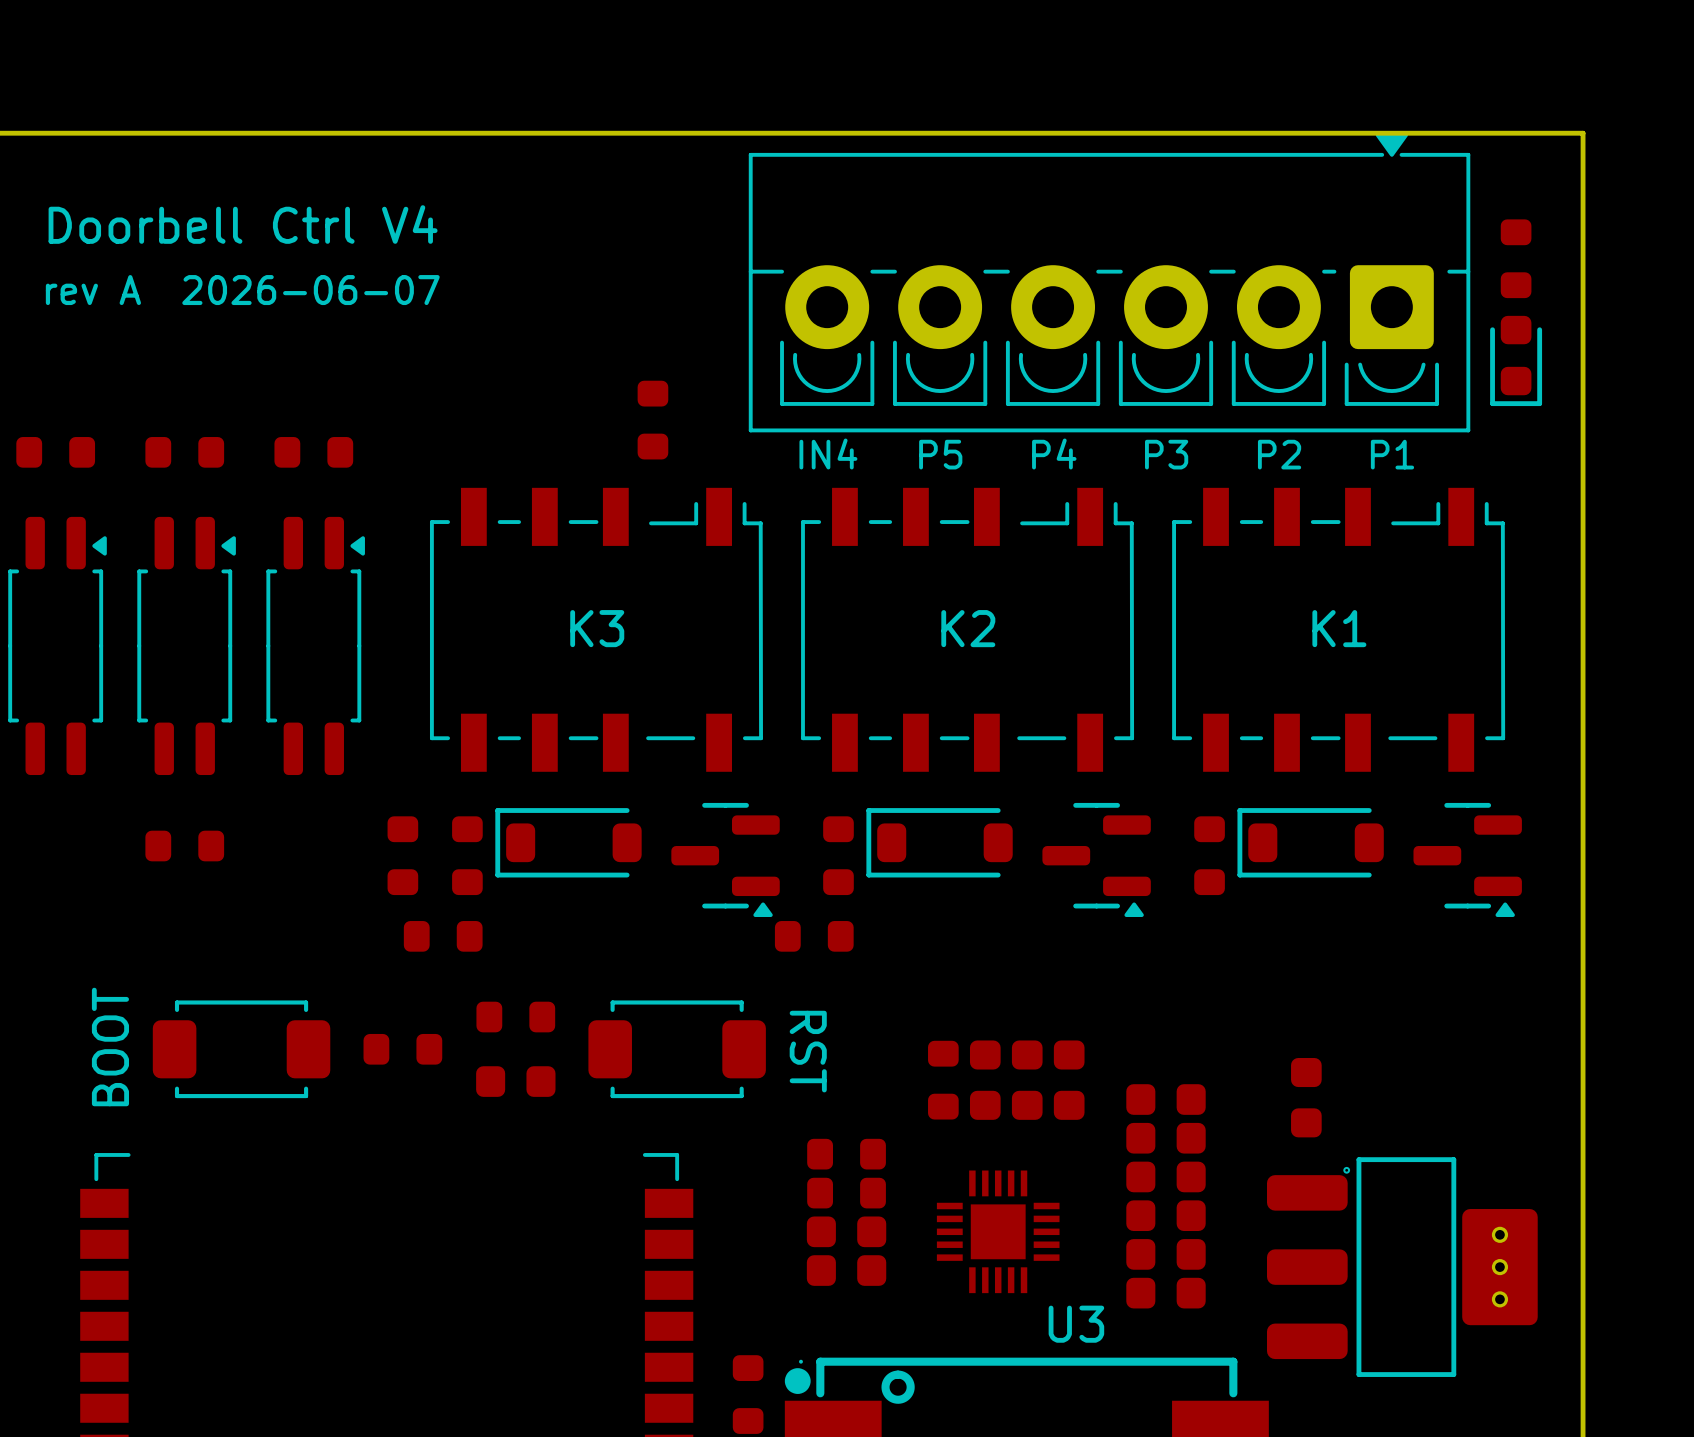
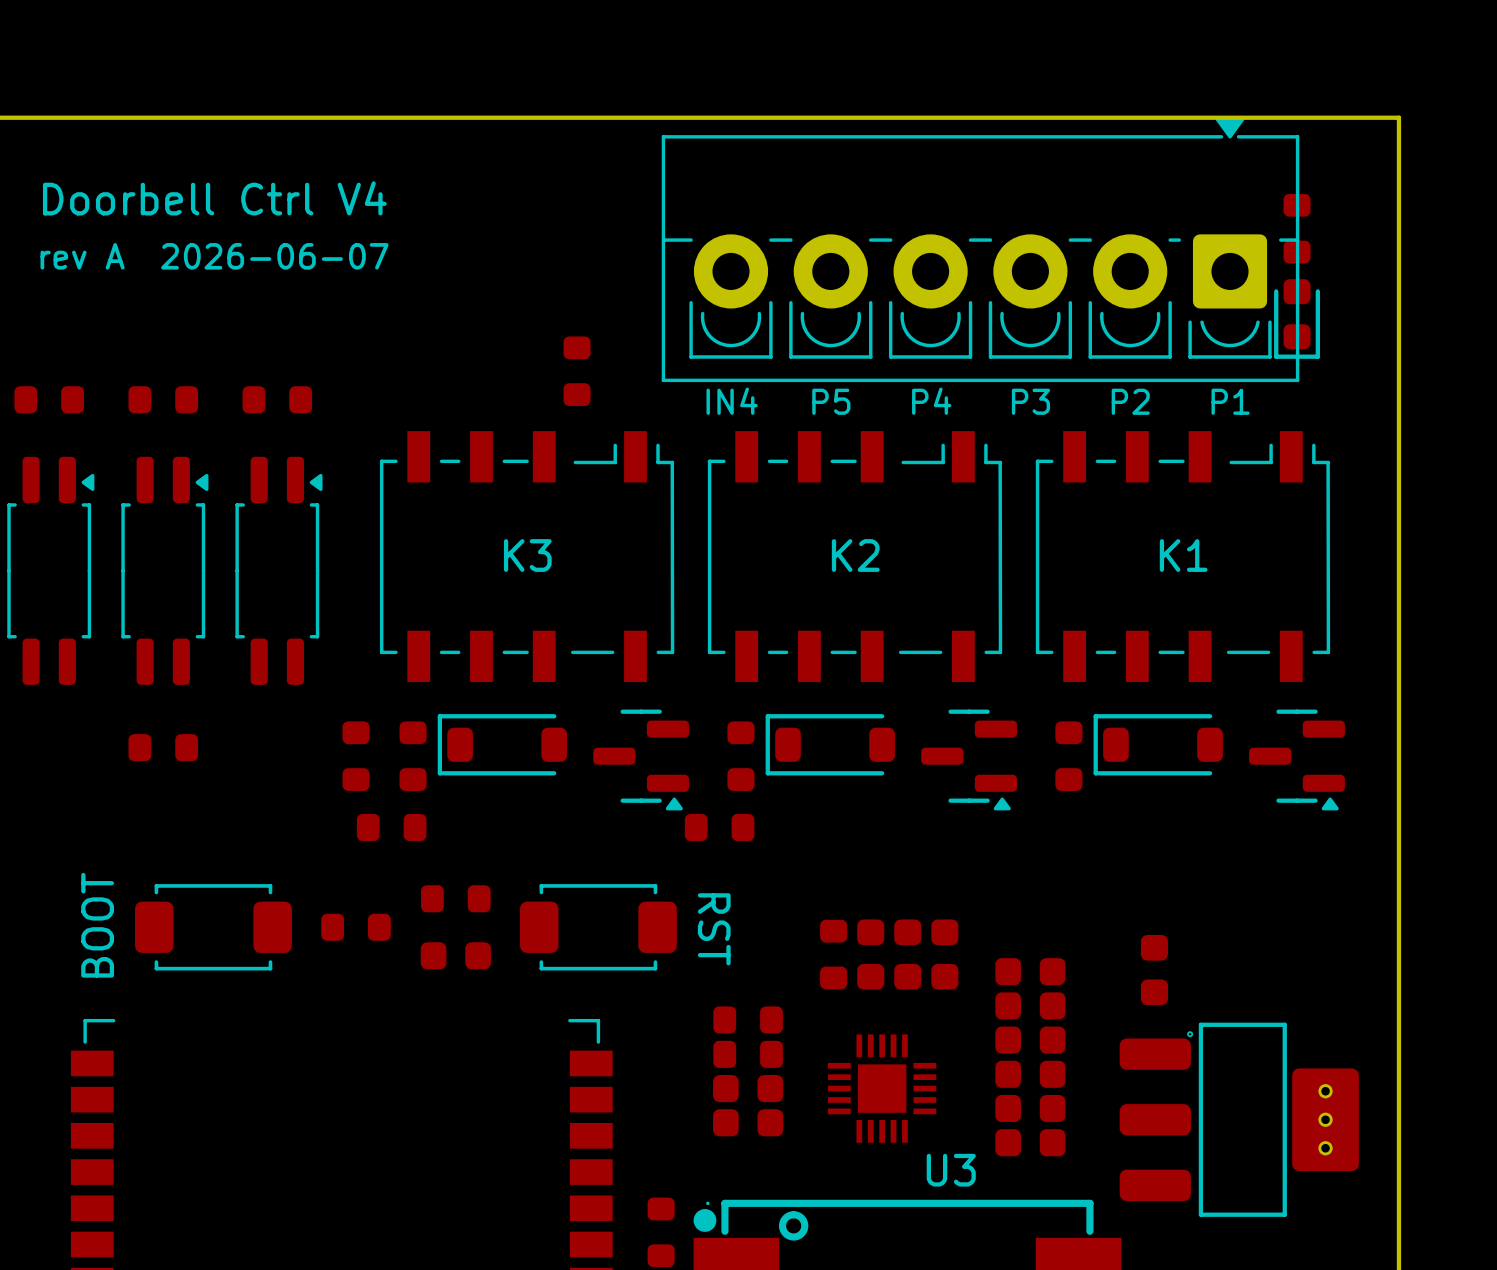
part position: (1516, 258) -> (1297, 228)
part position: (1516, 360) -> (1297, 318)

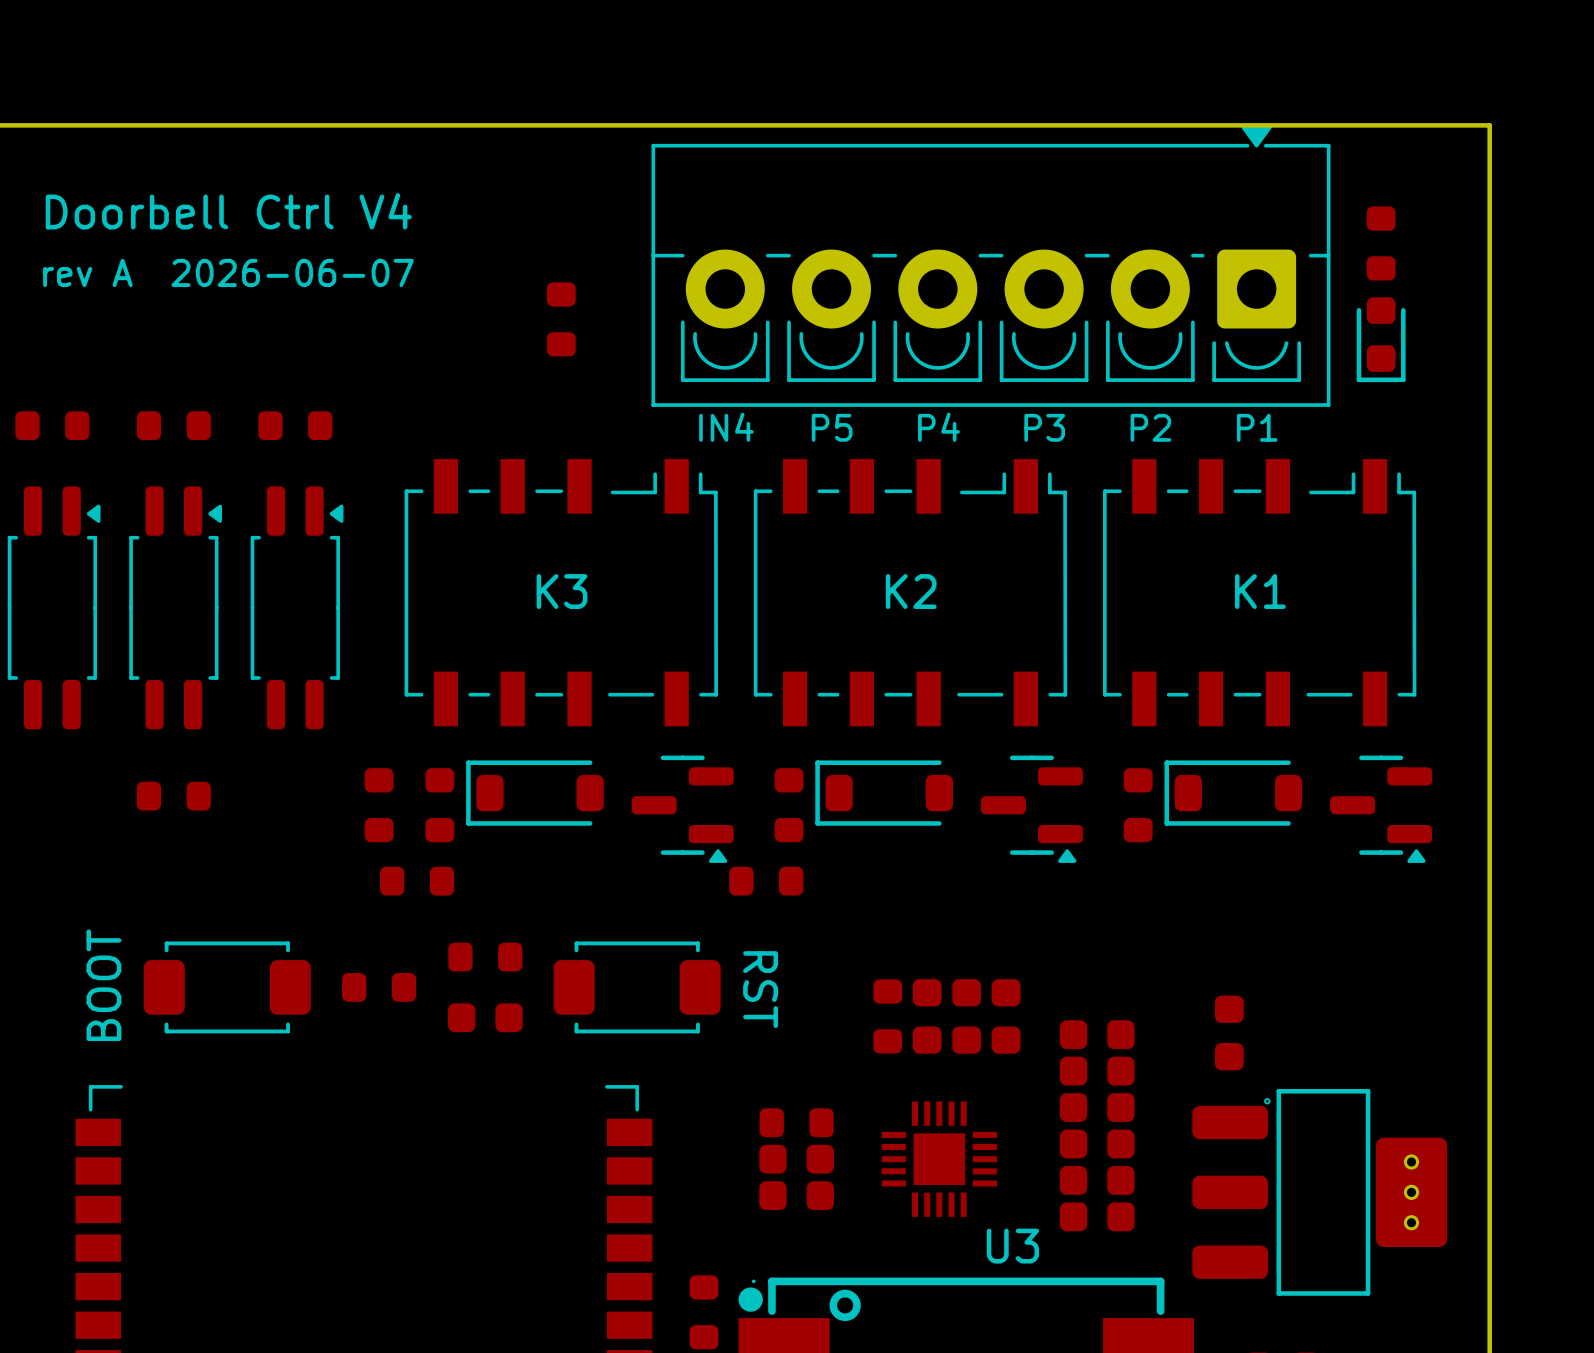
part position: (980, 249) -> (990, 266)
part position: (577, 371) -> (561, 319)
text position: IN4 (732, 401) -> IN4 (726, 427)
text position: P5 (831, 401) -> P5 (832, 427)
text position: P4 (931, 401) -> P4 (938, 427)
text position: P3 (1030, 401) -> P3 (1044, 427)
text position: P2 (1130, 401) -> P2 (1150, 427)
text position: P1 (1230, 401) -> P1 (1257, 427)
part: (748, 1019) -> none

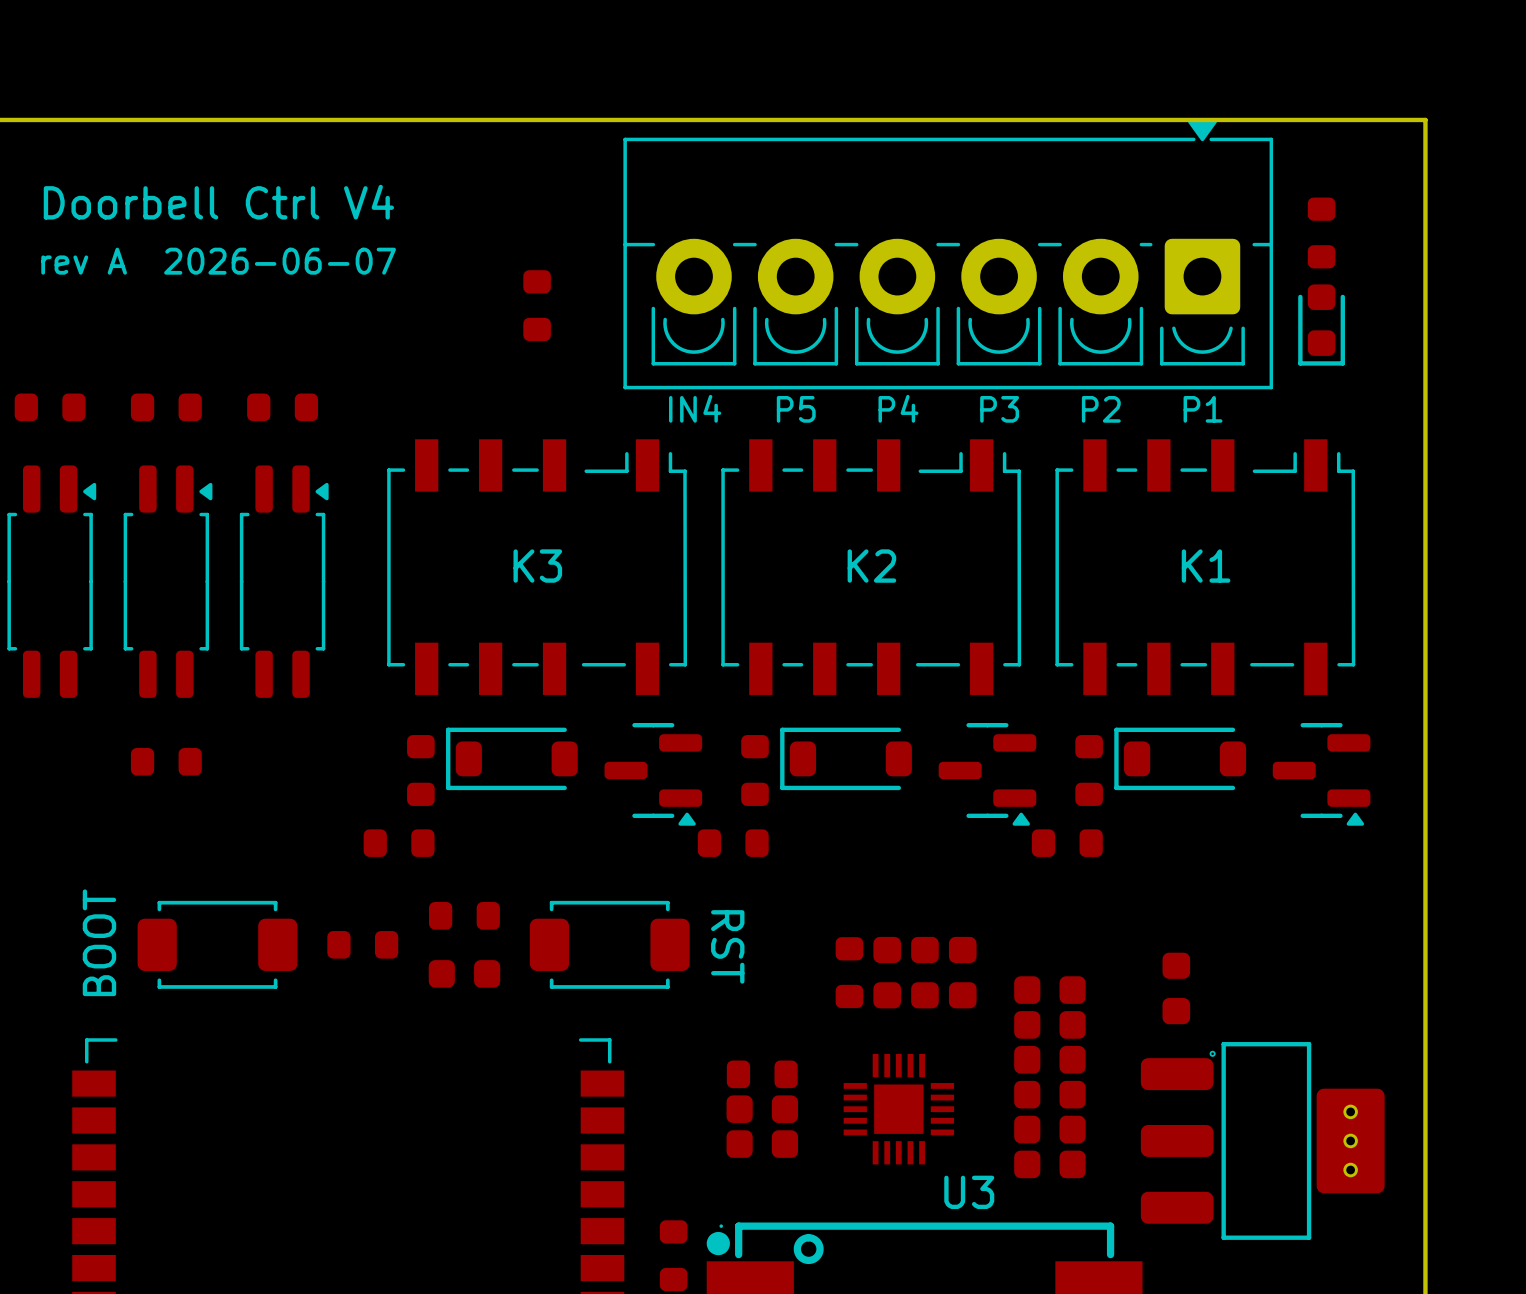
part rotation: 0° (379, 805) -> 90° clockwise (1067, 843)
part position: (379, 805) -> (1067, 843)

